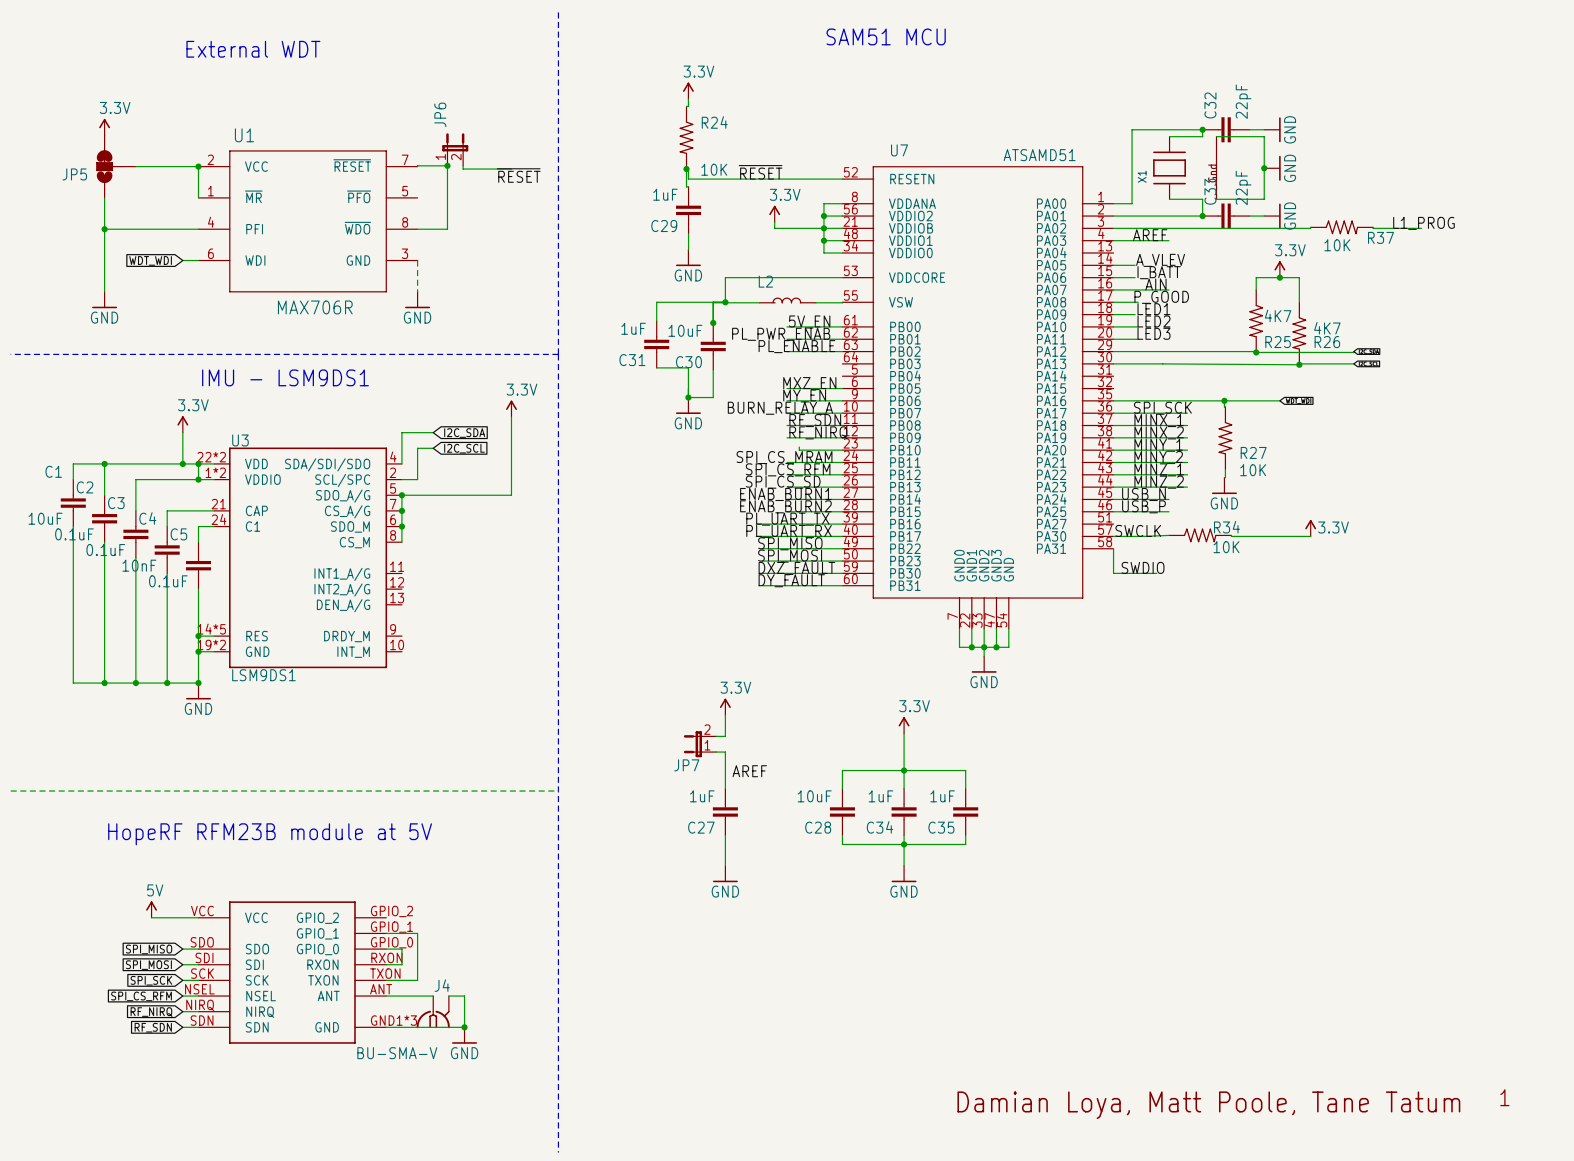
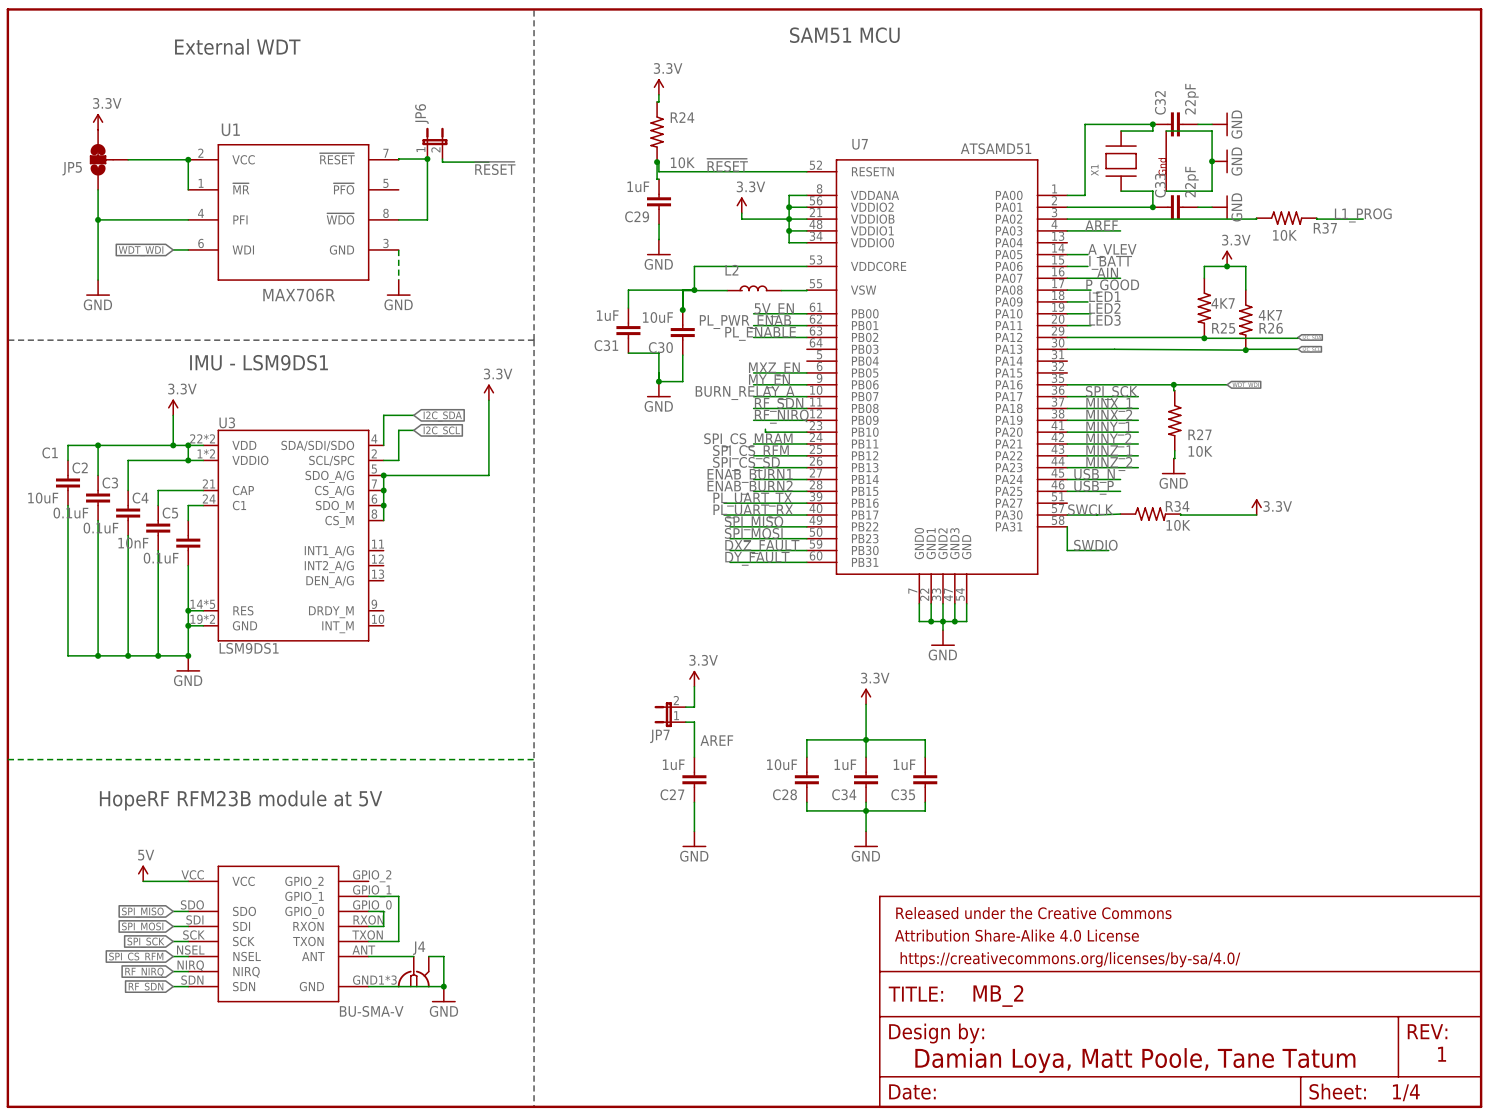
part: none -> (744, 558)
part: none -> (1180, 1001)

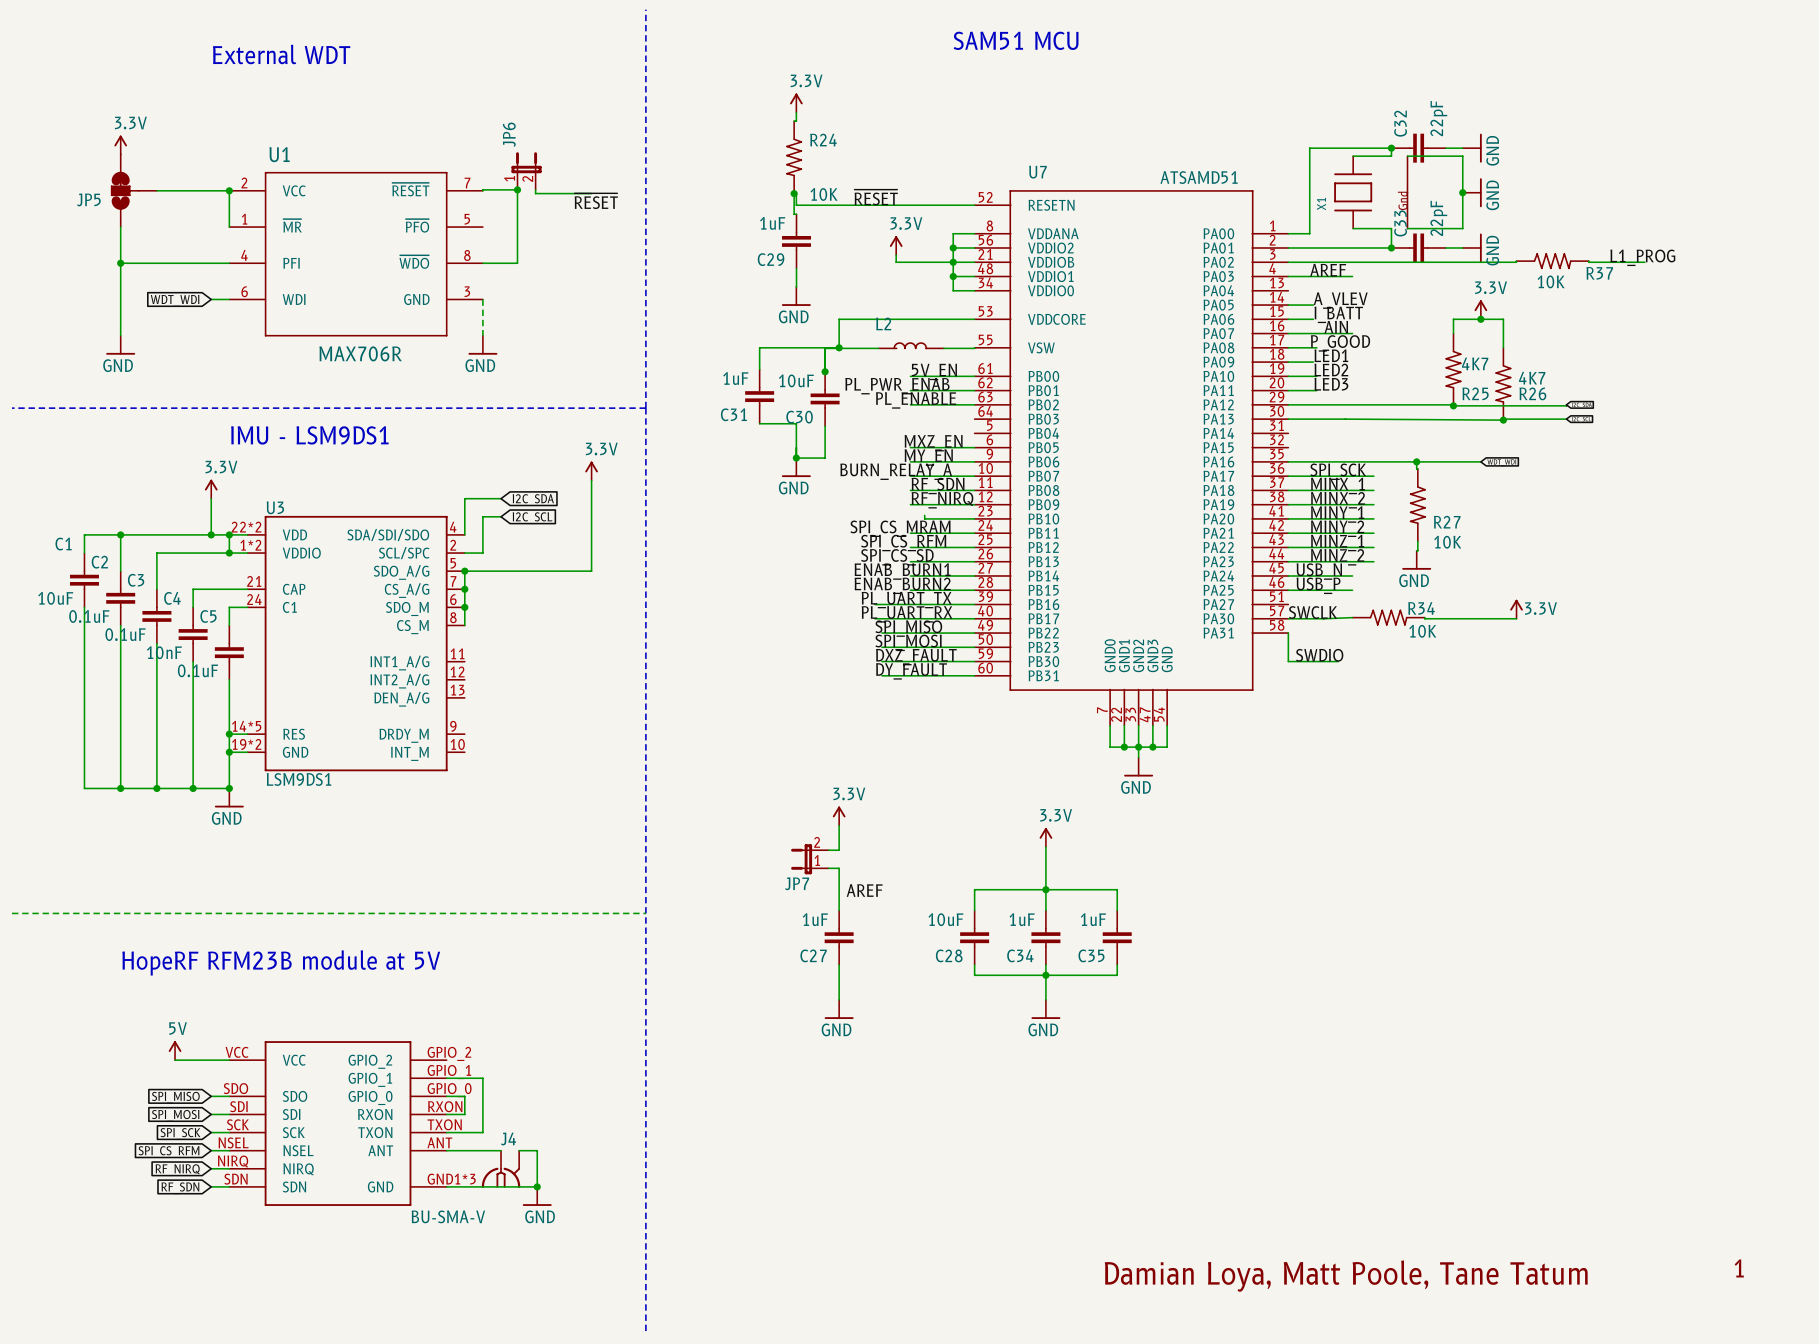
part: (744, 558) -> none
part: (1180, 1001) -> none

